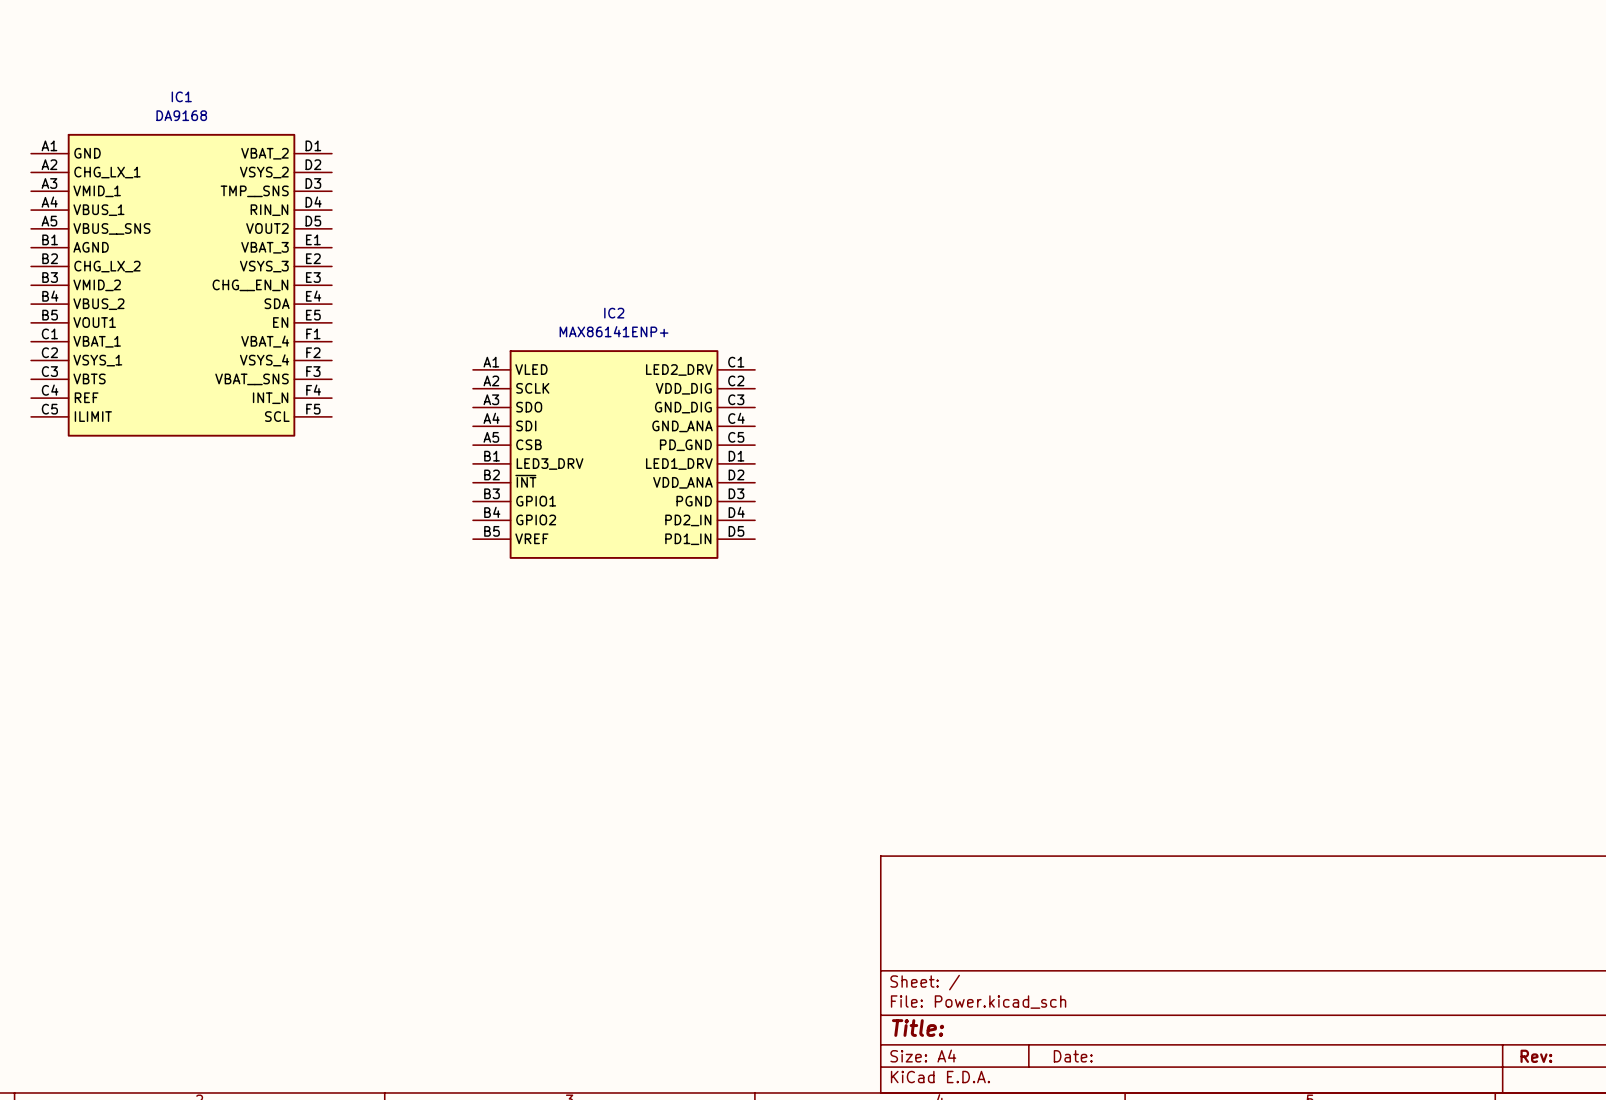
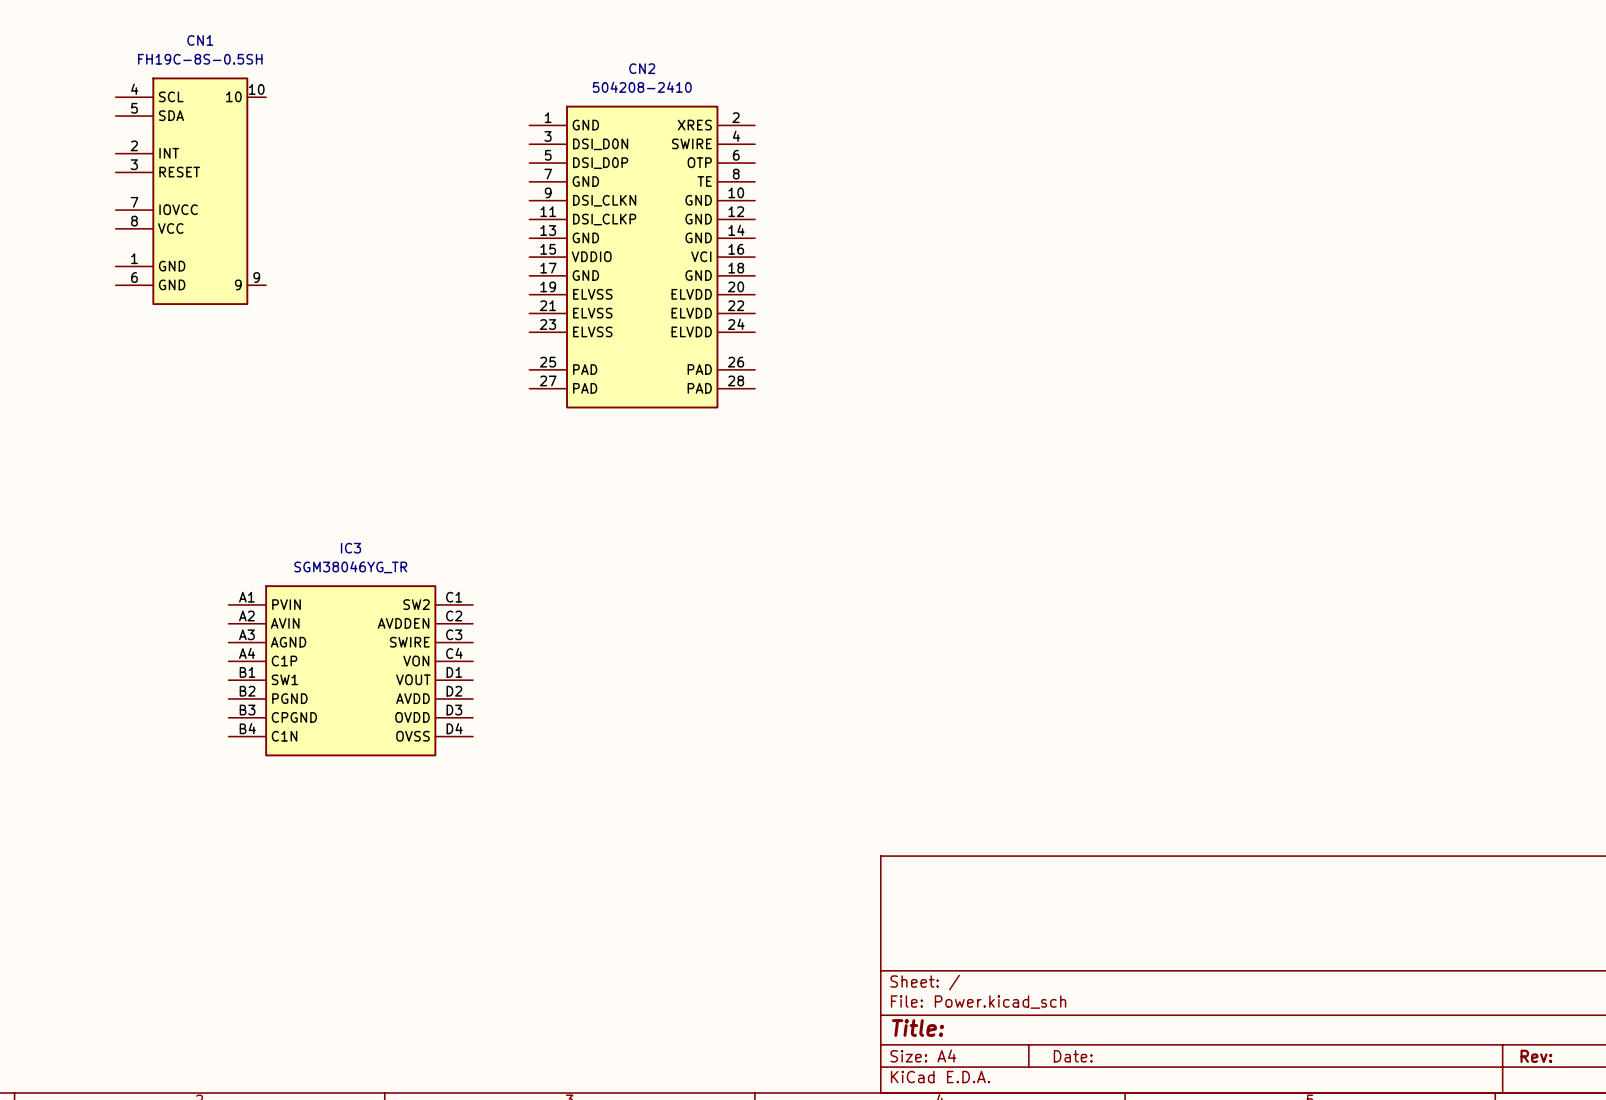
CN1: none -> FH19C-8S-0.5SH (190, 191)
CN2: none -> 504208-2410 (642, 257)
IC1: DA9168 (181, 285) -> none
IC2: MAX86141ENP+ (614, 454) -> none
IC3: none -> SGM38046YG_TR (350, 670)

